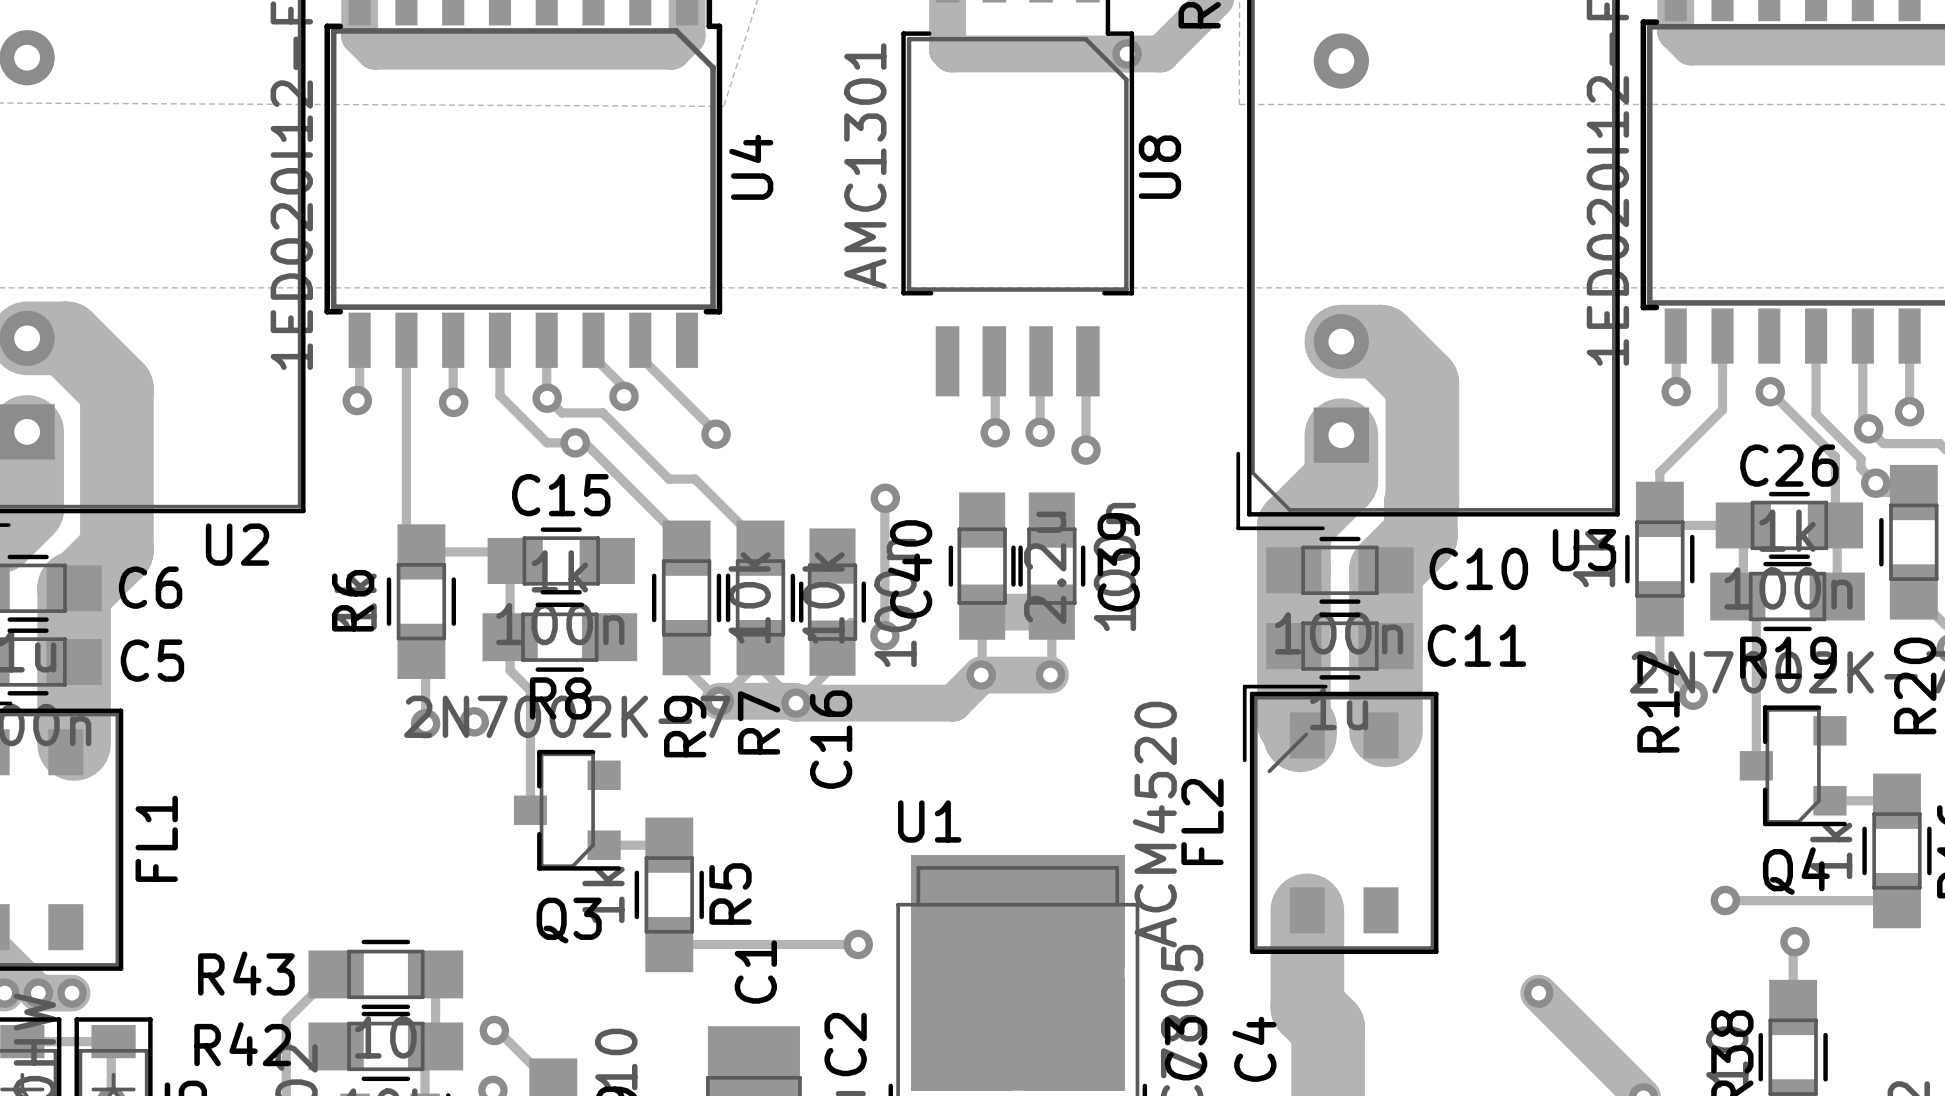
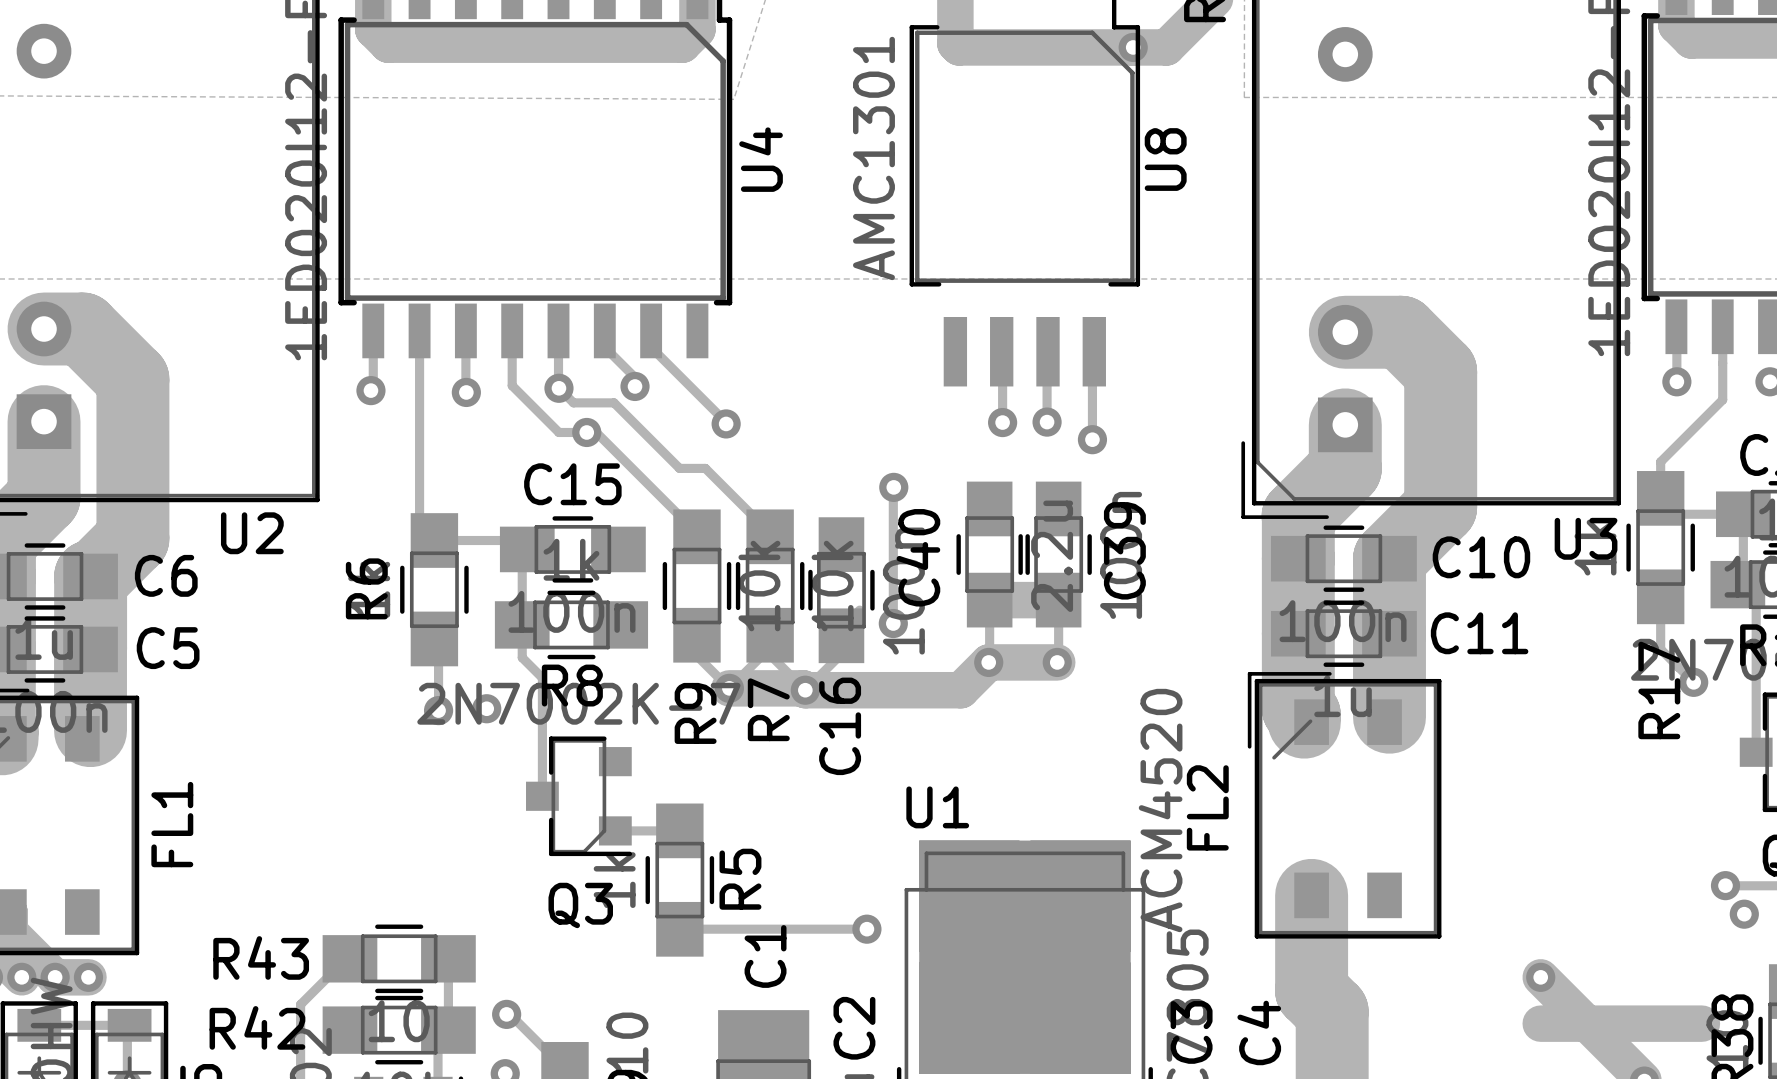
track: (1380, 341) (1422, 383) (1420, 535) -> (1383, 332) (1401, 332) (1440, 371) (1440, 507) (1424, 524)
via: none -> (1744, 914)
track: none -> (1540, 1023) (1701, 1023)

